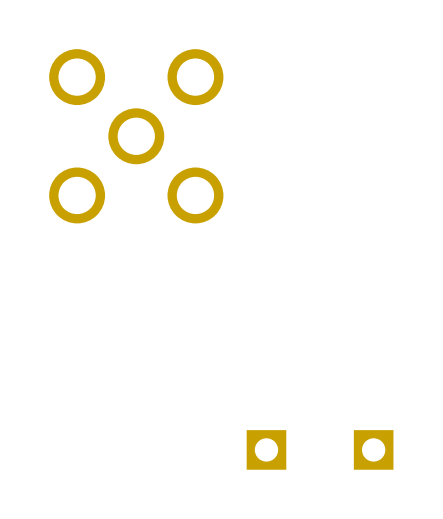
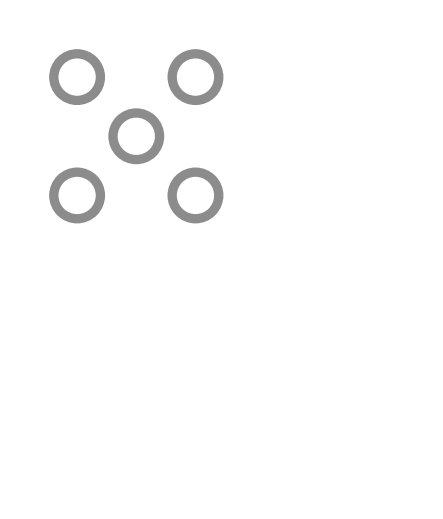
part: (266, 449) -> none
part: (373, 449) -> none

